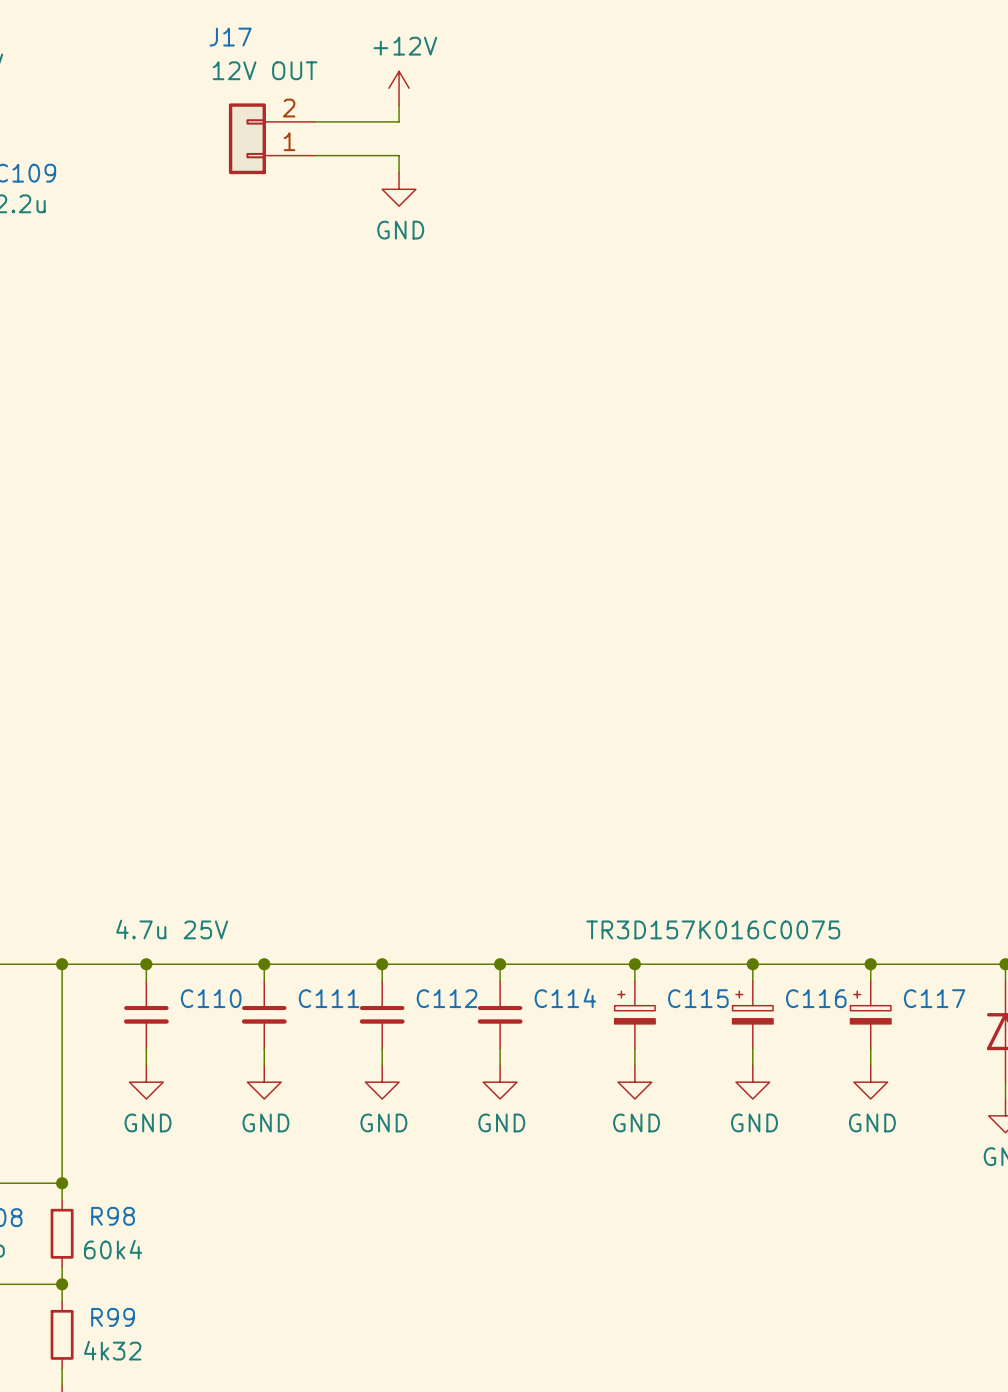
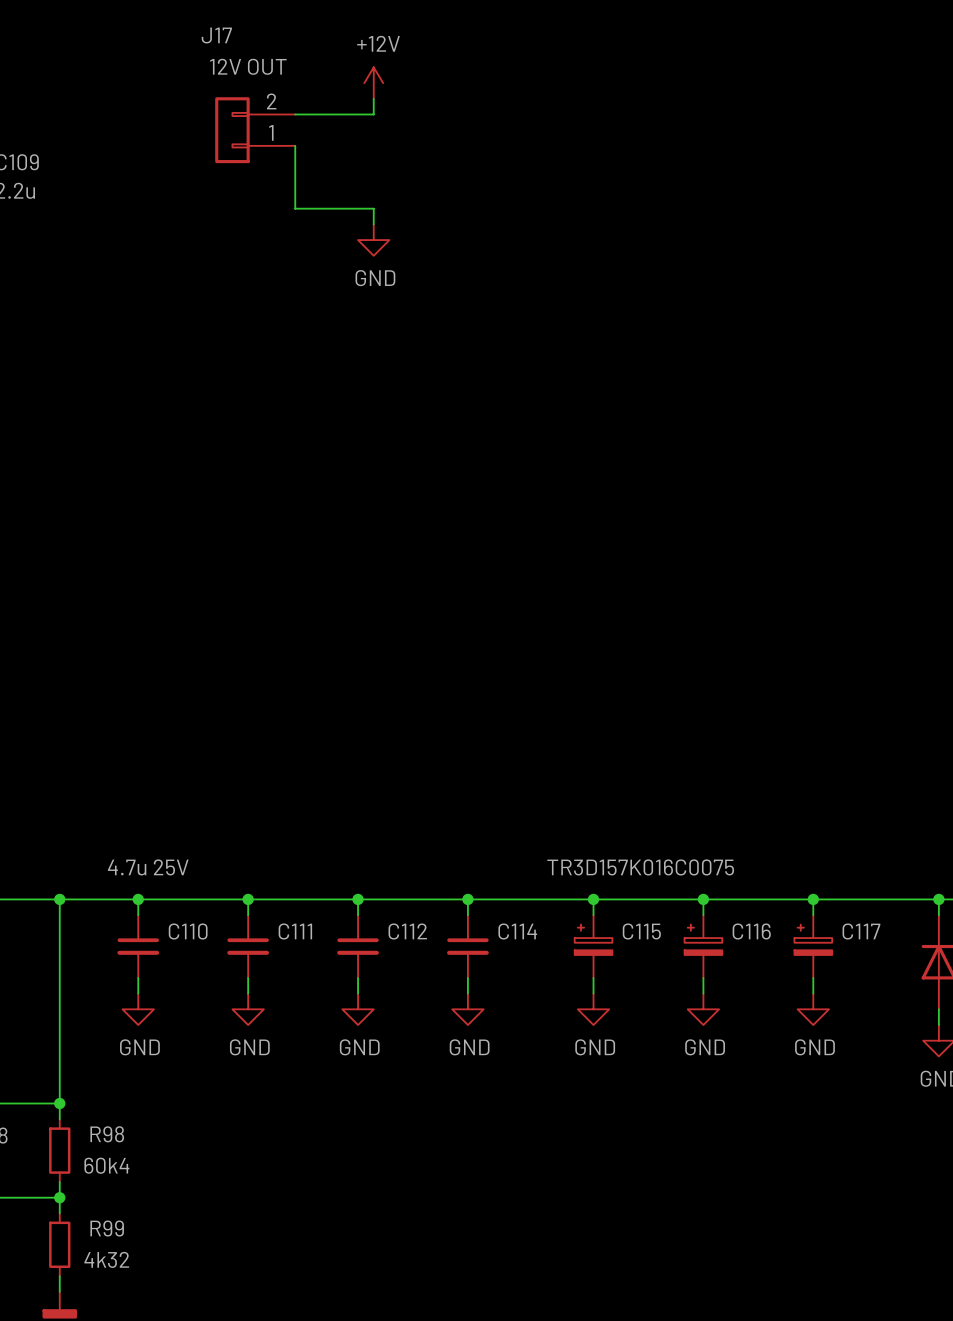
wire: (314, 155) (399, 155) (399, 172) -> (295, 145) (295, 208) (373, 208) (373, 224)
power symbol position: GND (399, 189) -> GND (373, 240)

